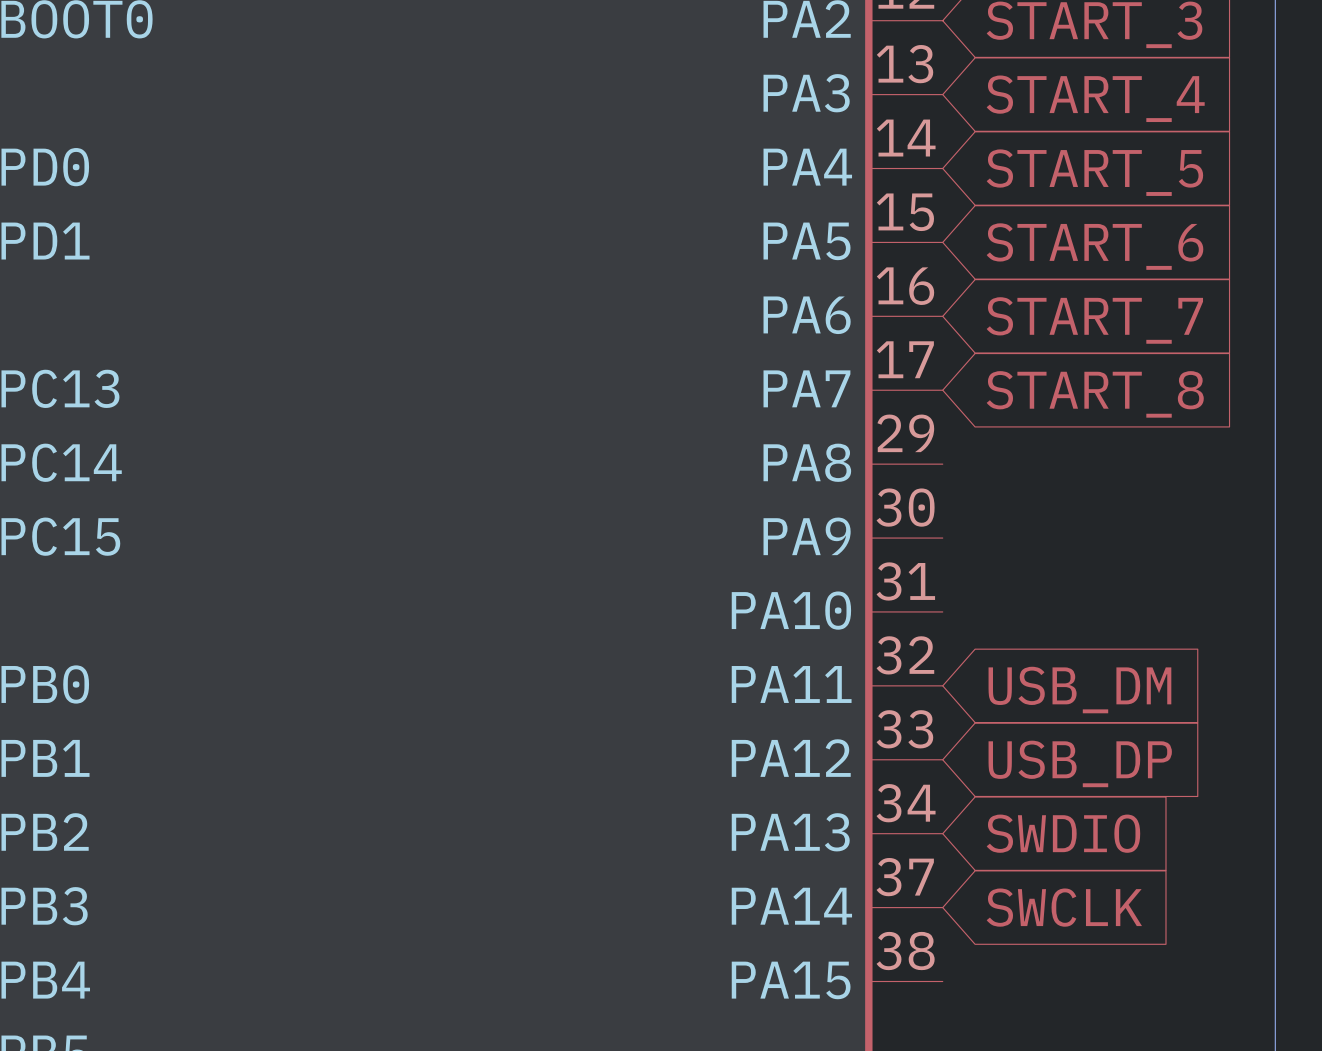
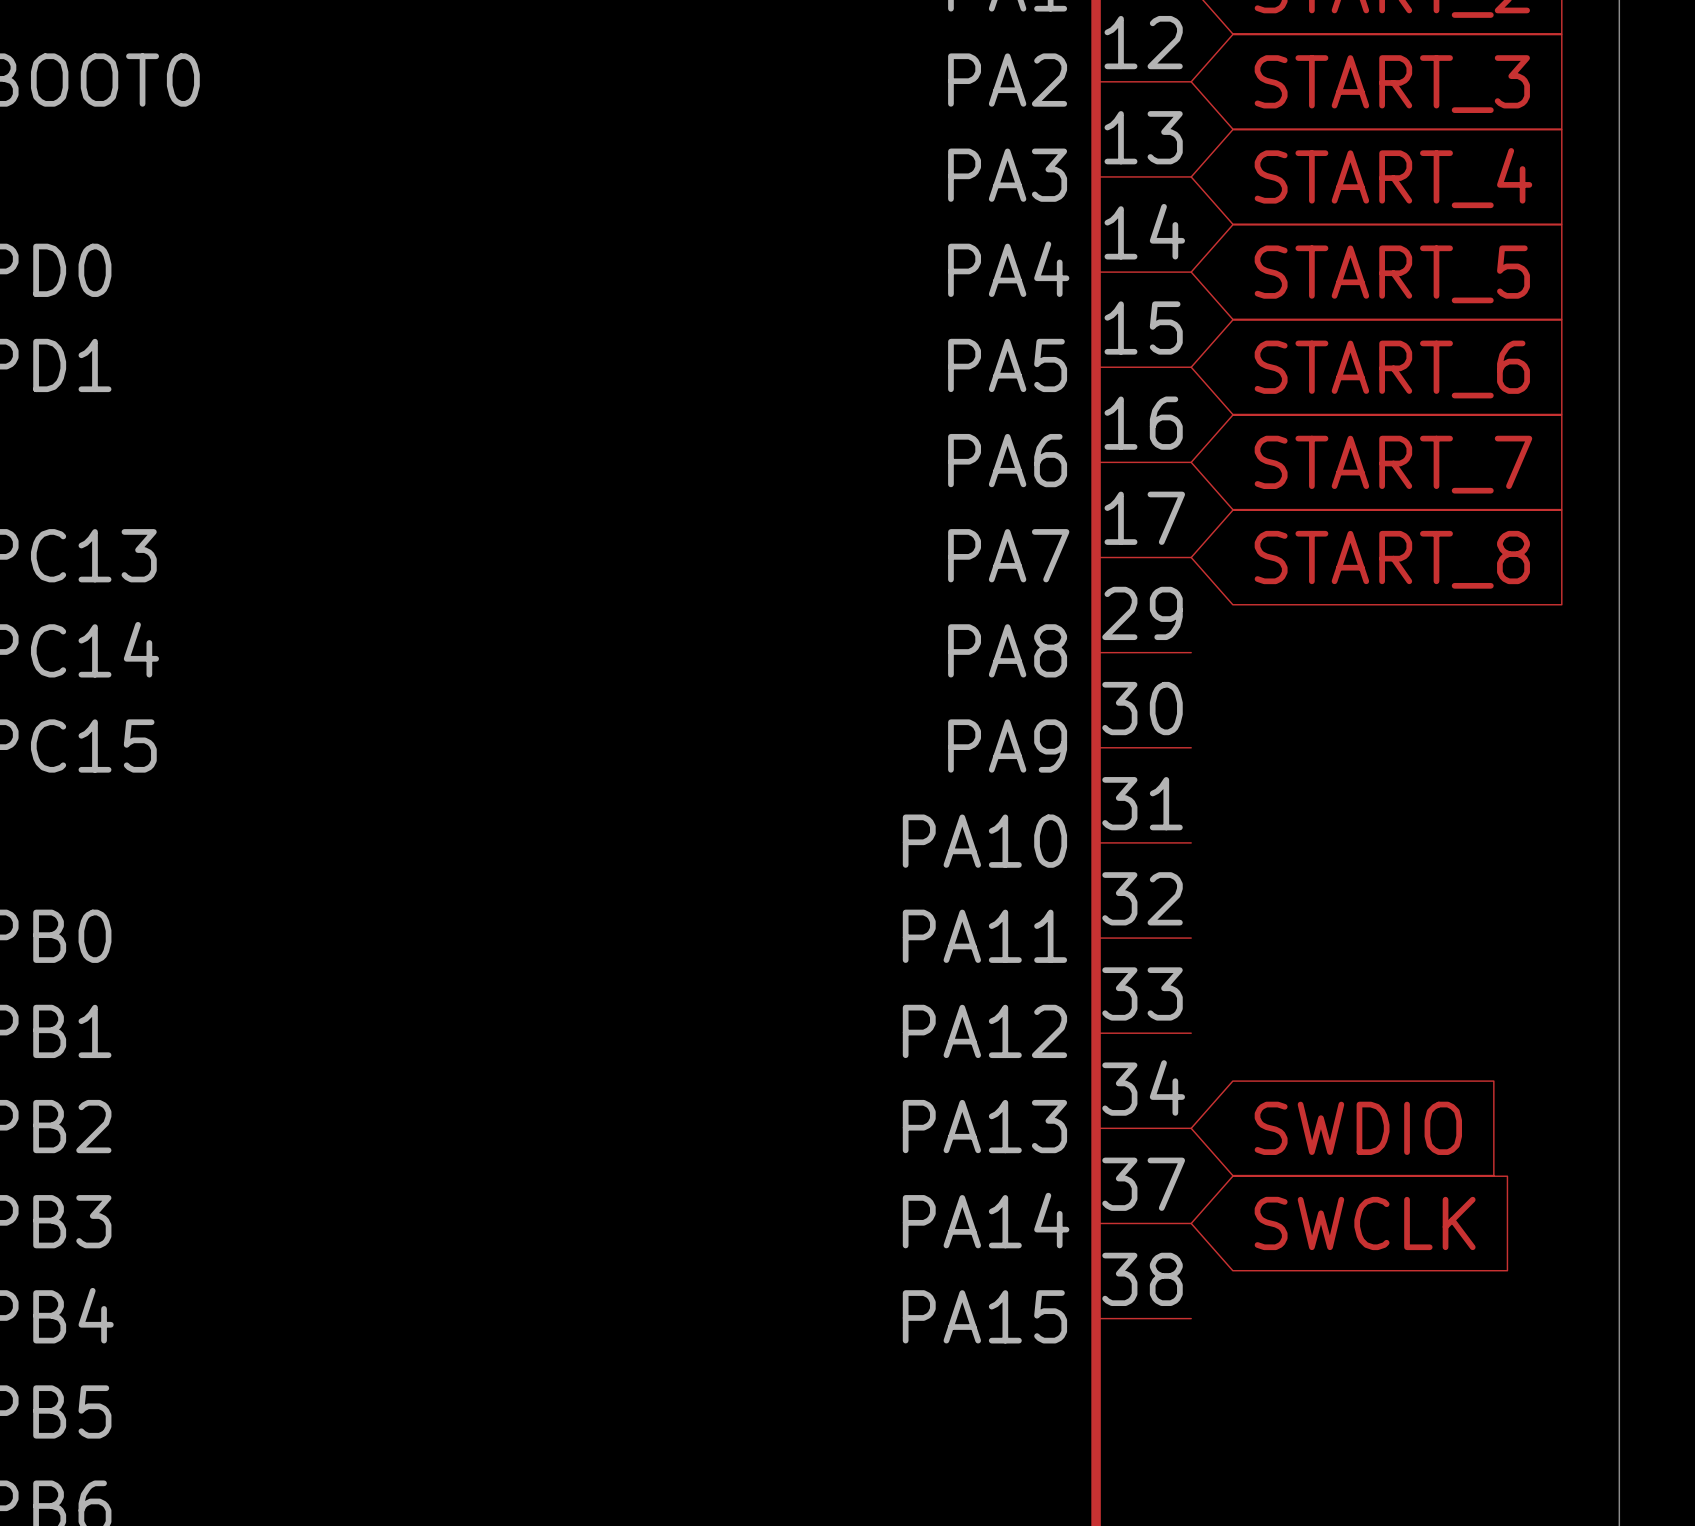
global label: USB_DM (1079, 690) -> none
global label: USB_DP (1080, 763) -> none

